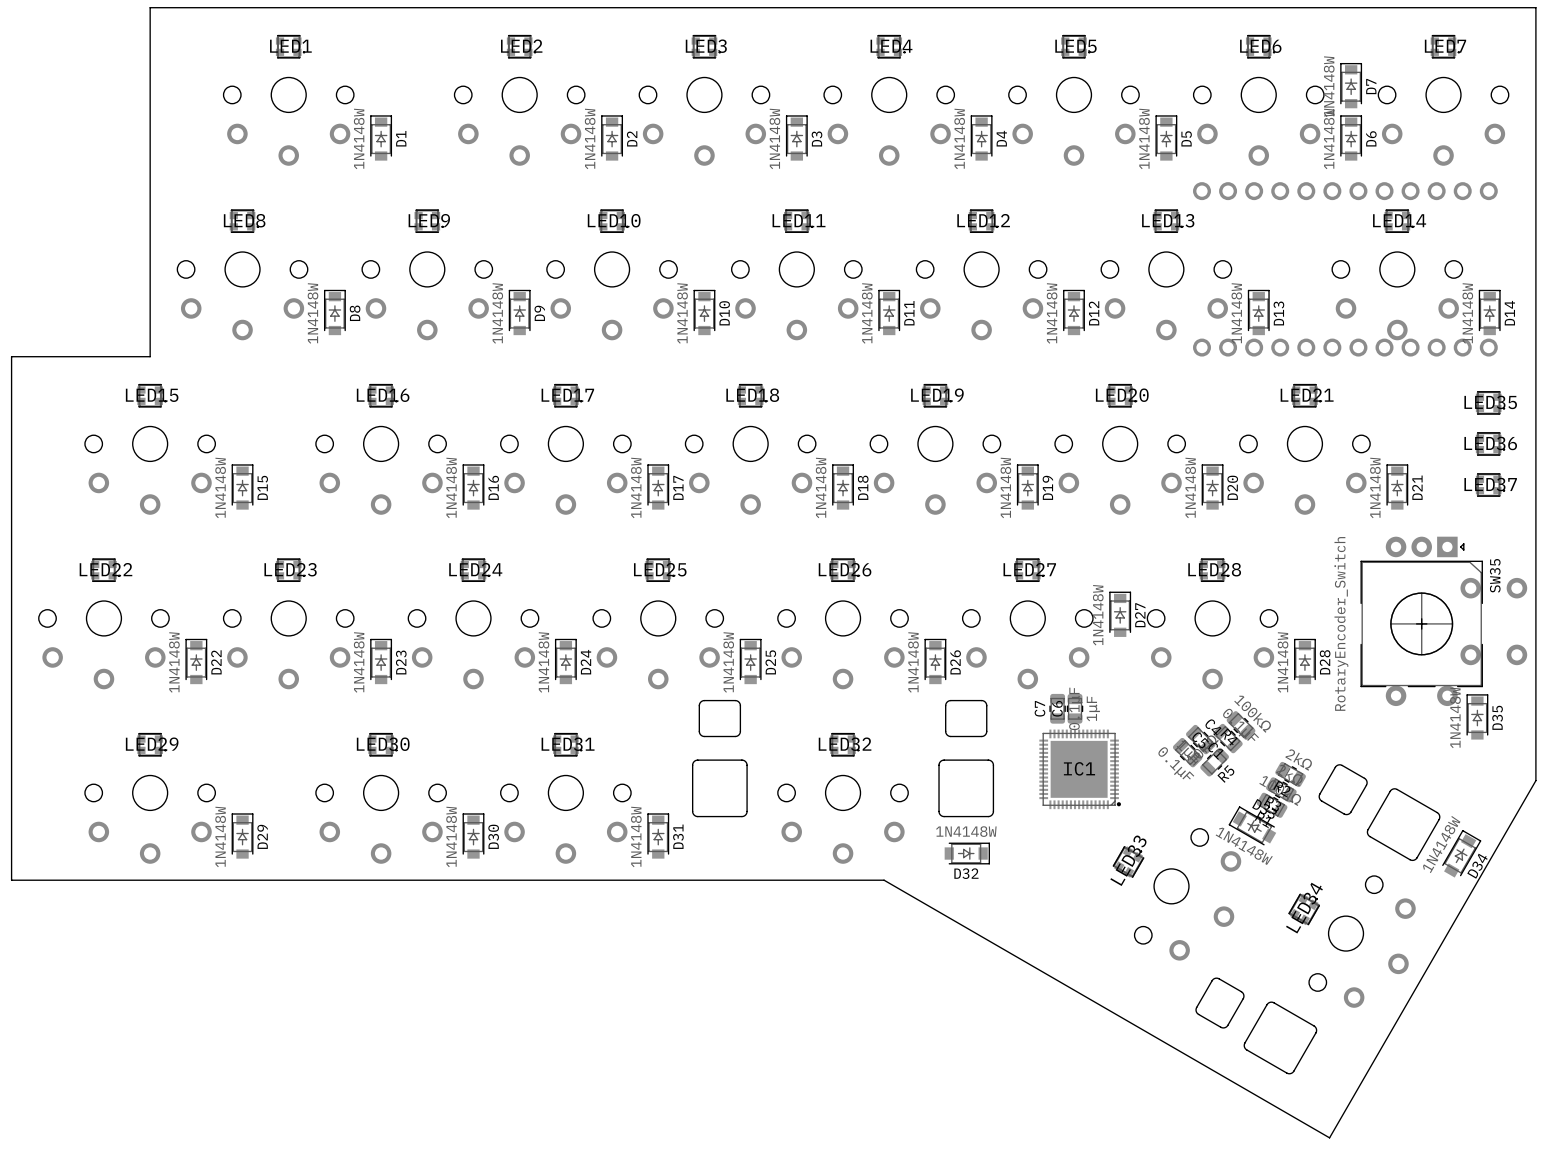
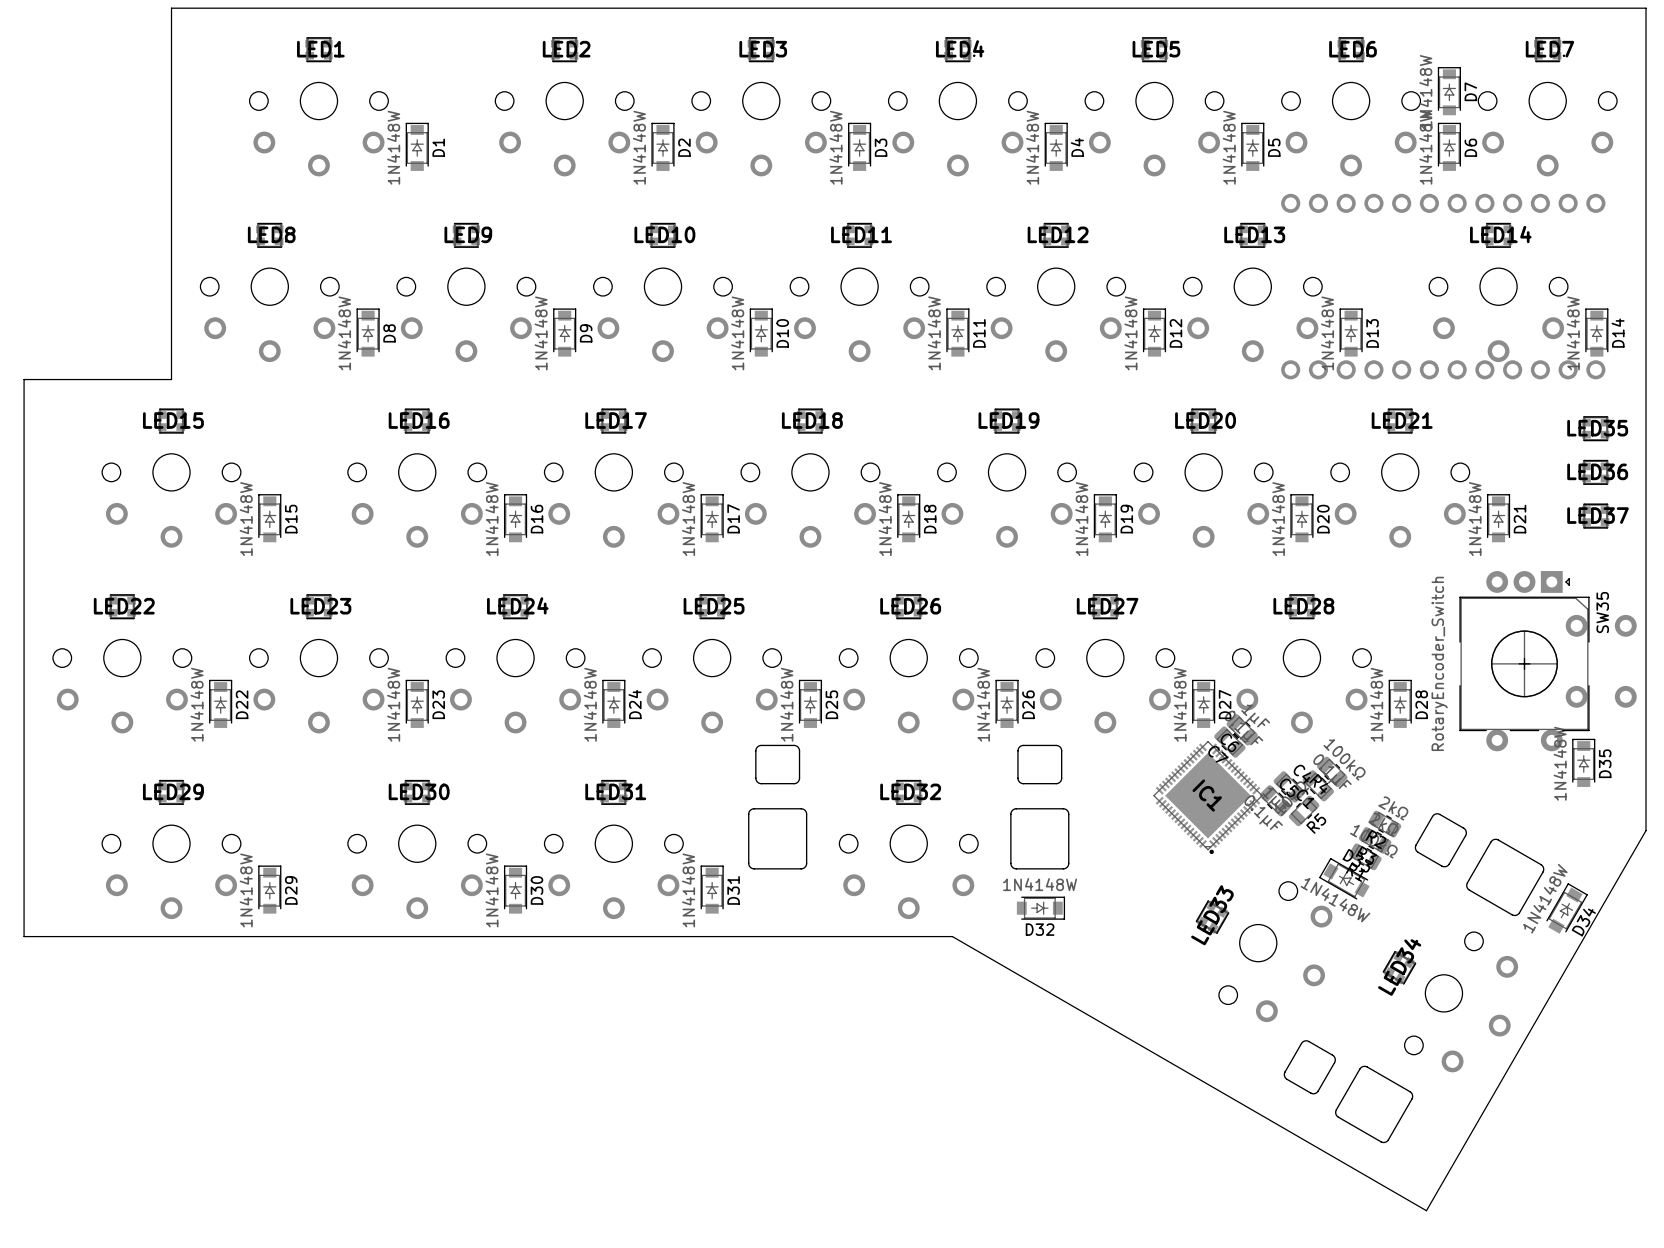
D27 position: (1120, 614) -> (1203, 703)
C7 rotation: 0° (1057, 708) -> 45° counterclockwise (1229, 742)
C7 position: (1057, 708) -> (1229, 742)
C6 rotation: 0° (1075, 708) -> 45° counterclockwise (1242, 729)
C6 position: (1075, 708) -> (1242, 729)
IC1 rotation: 0° (1080, 769) -> 45° clockwise (1208, 797)

